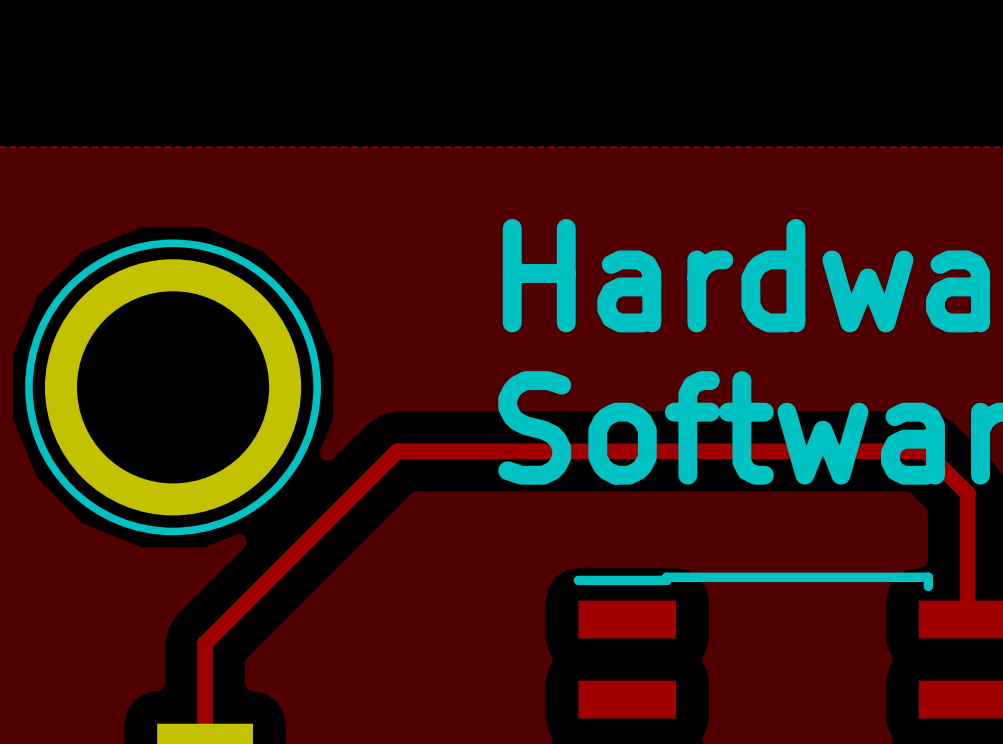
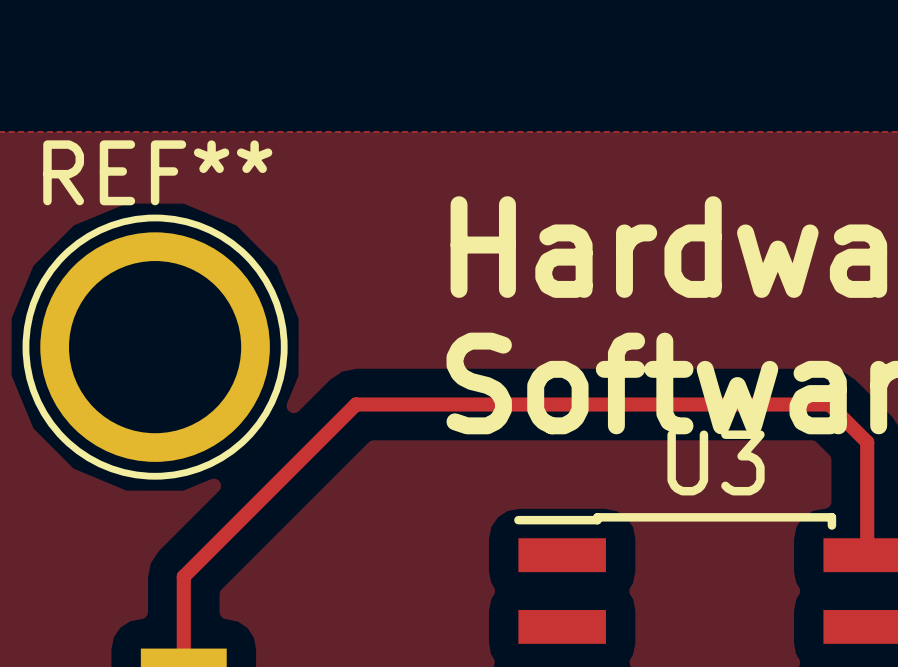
REF** name: none -> REF** (157, 172)
U3 name: none -> U3 (716, 462)

